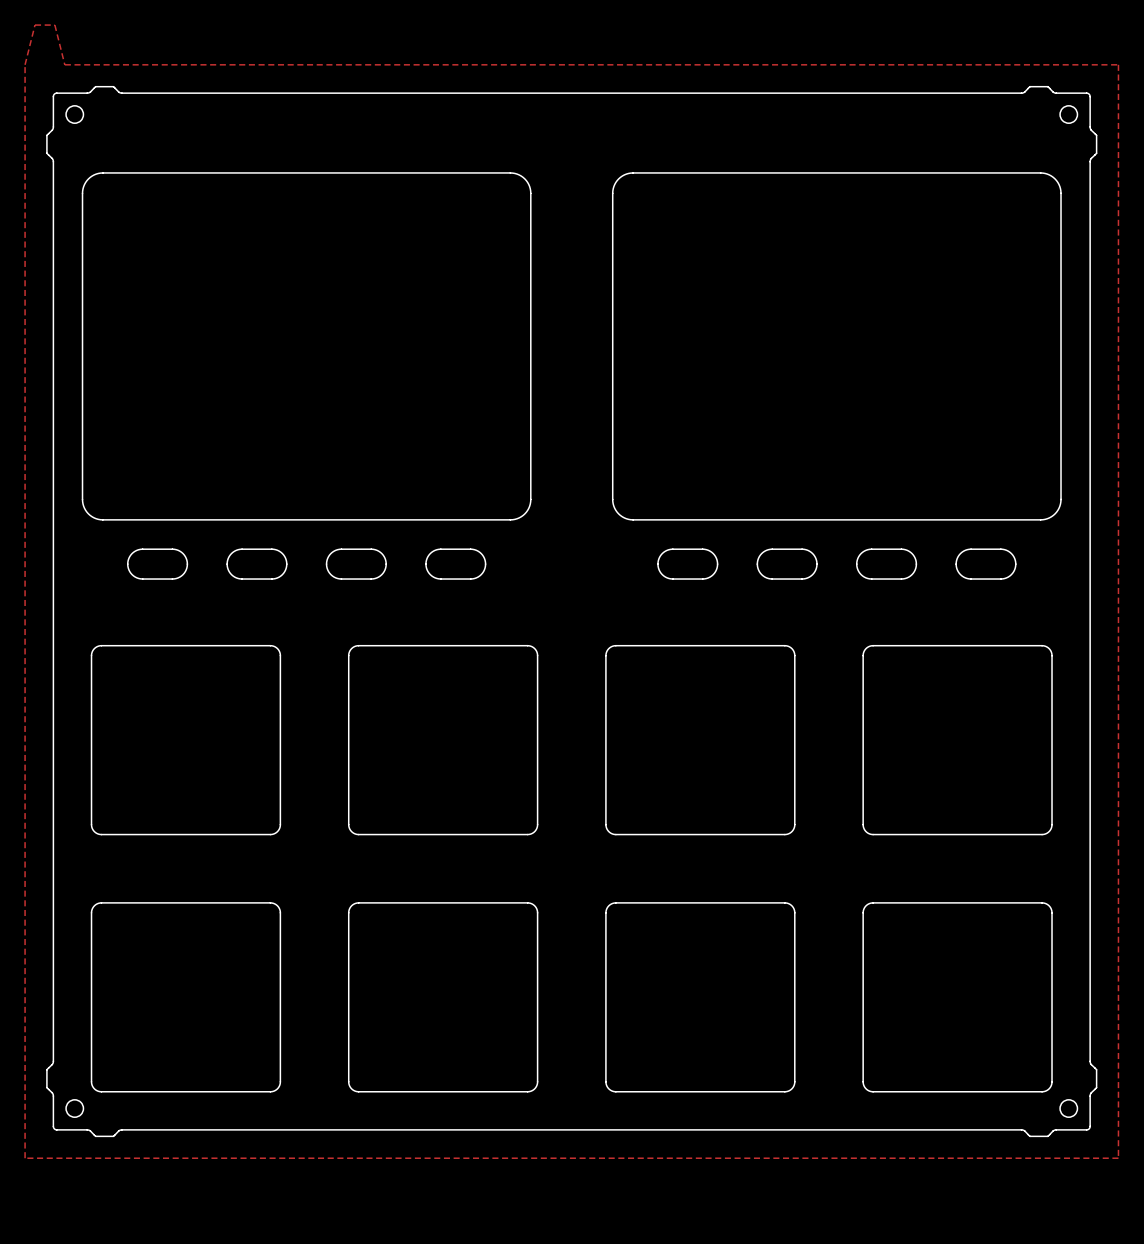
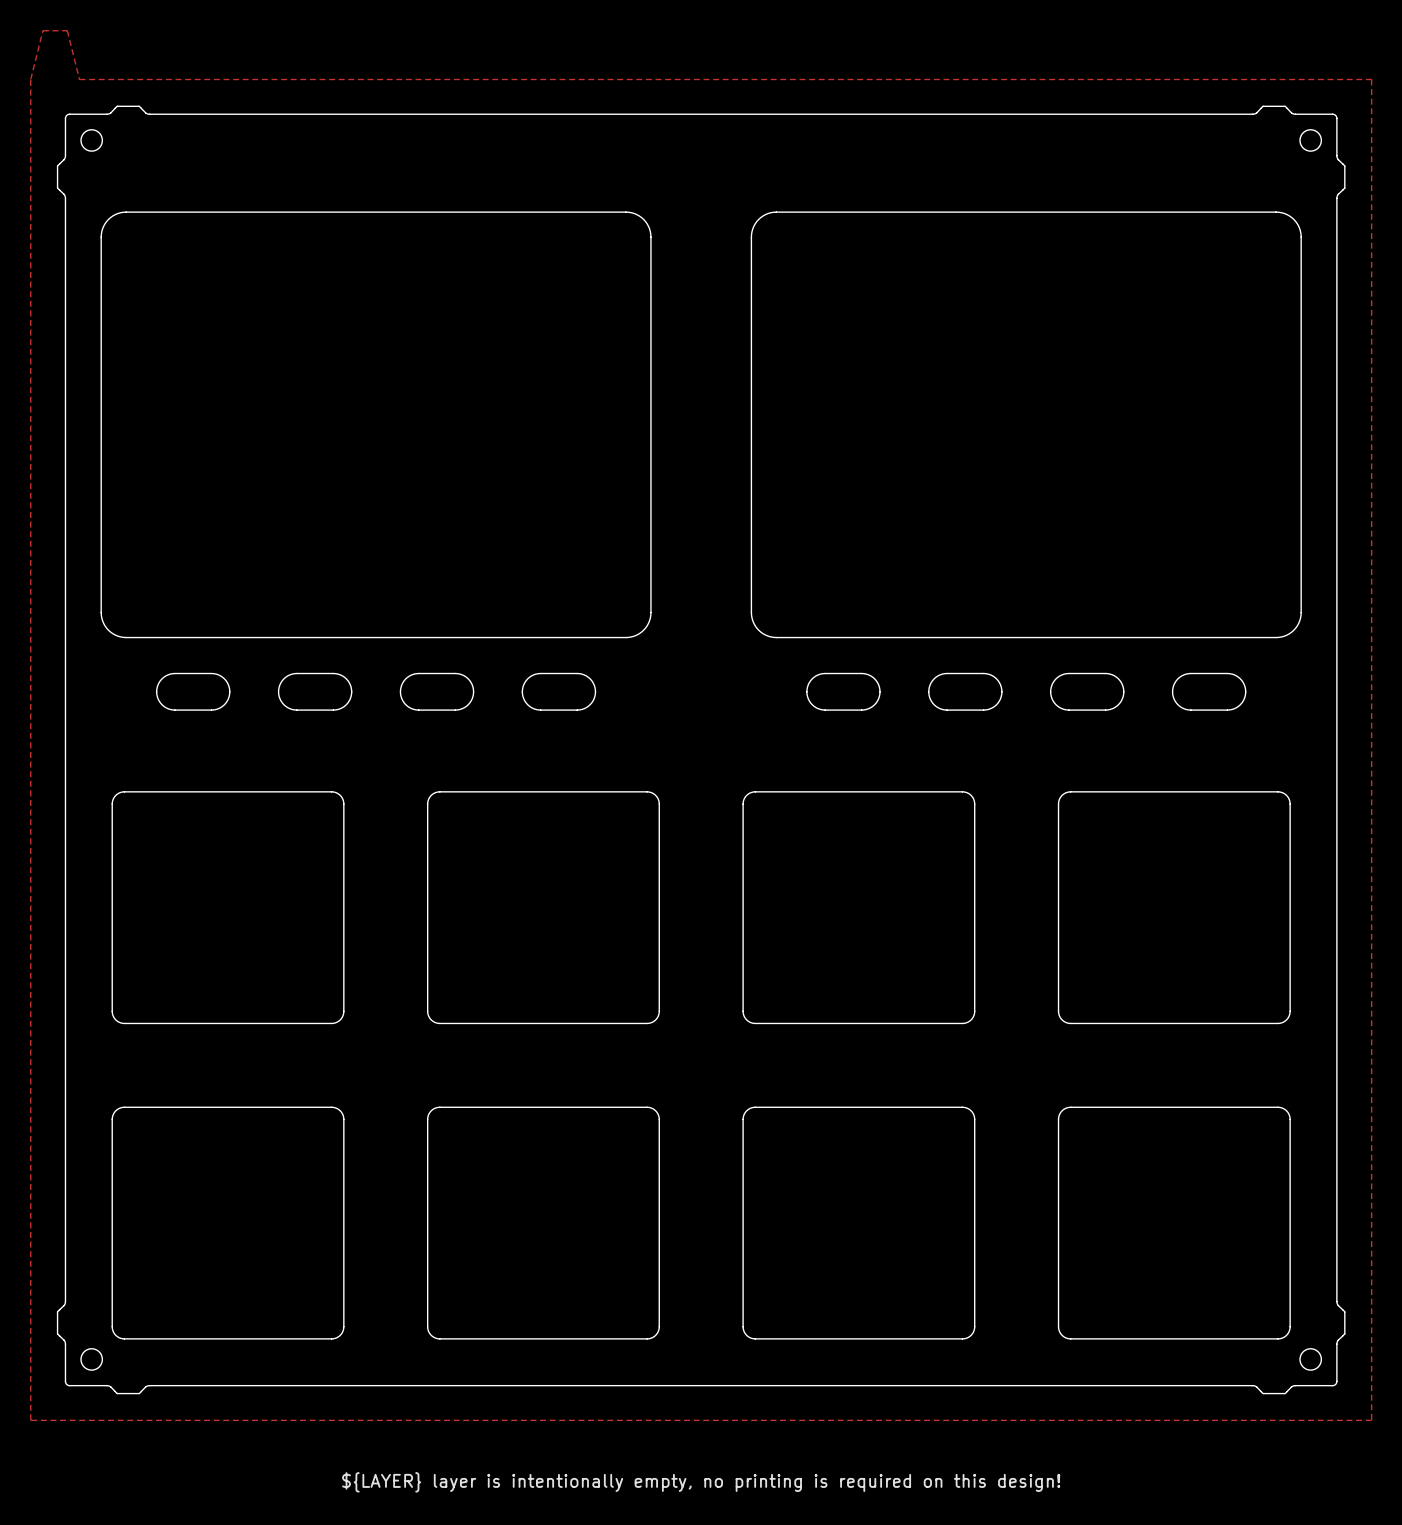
text: none -> ${LAYER} layer is intentionally empty, no printing is required on this design! (701, 1482)

